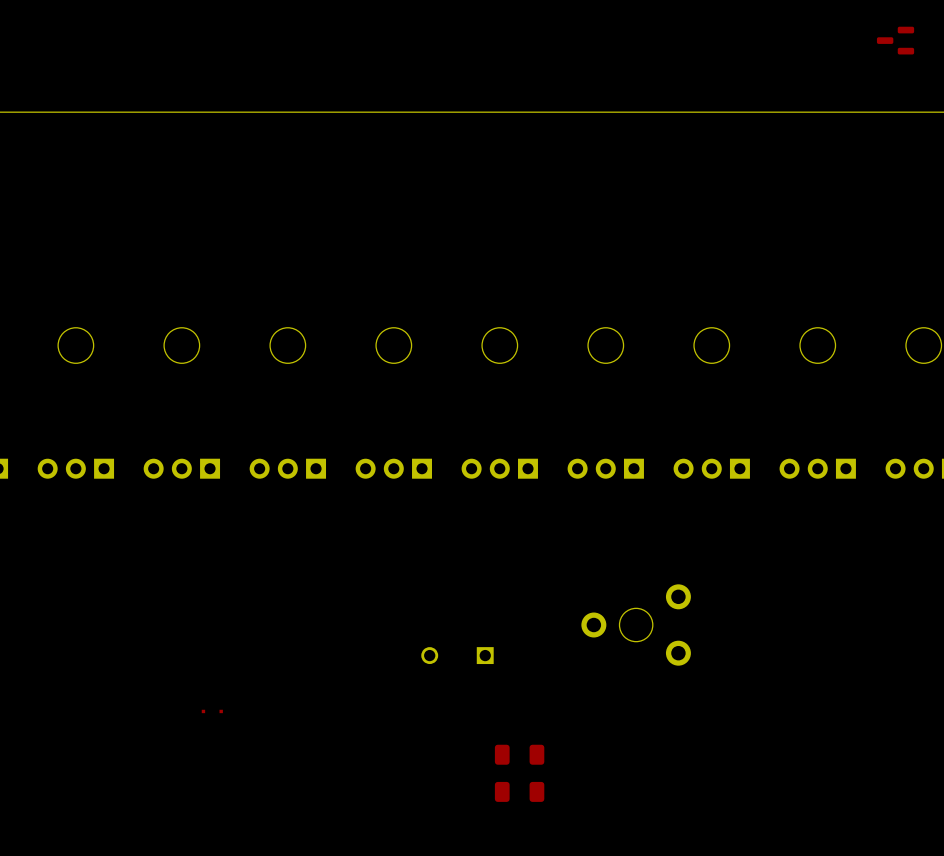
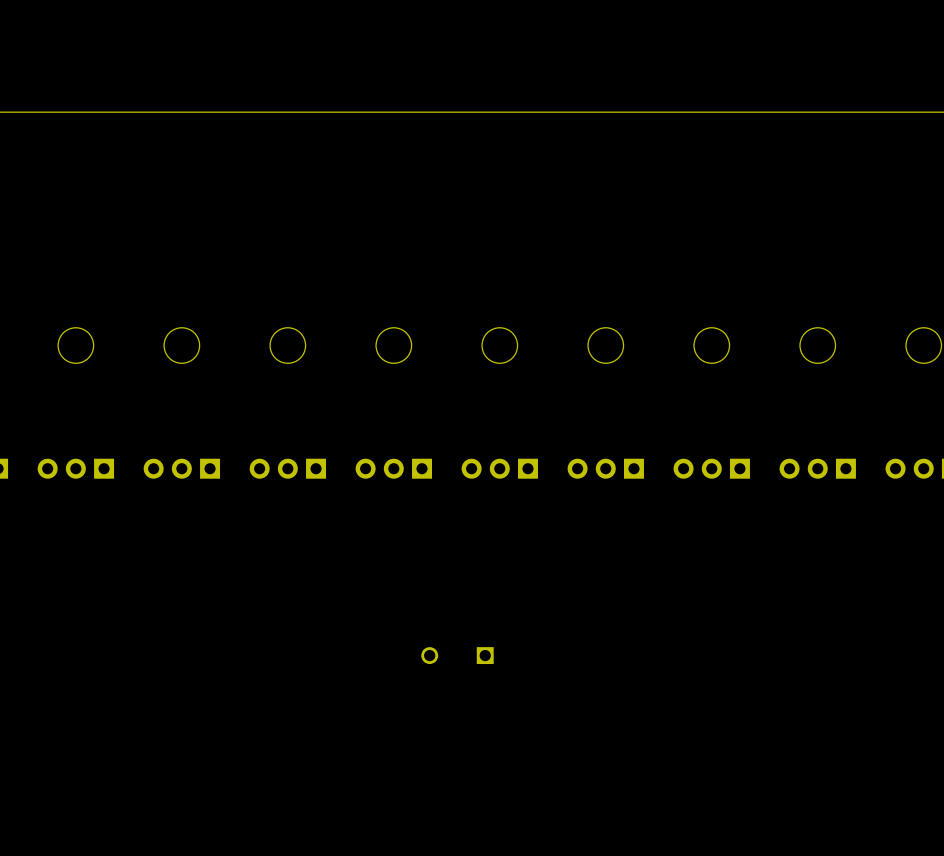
part: (895, 40) -> none
part: (636, 625) -> none
part: (212, 711) -> none
part: (519, 754) -> none
part: (519, 791) -> none

